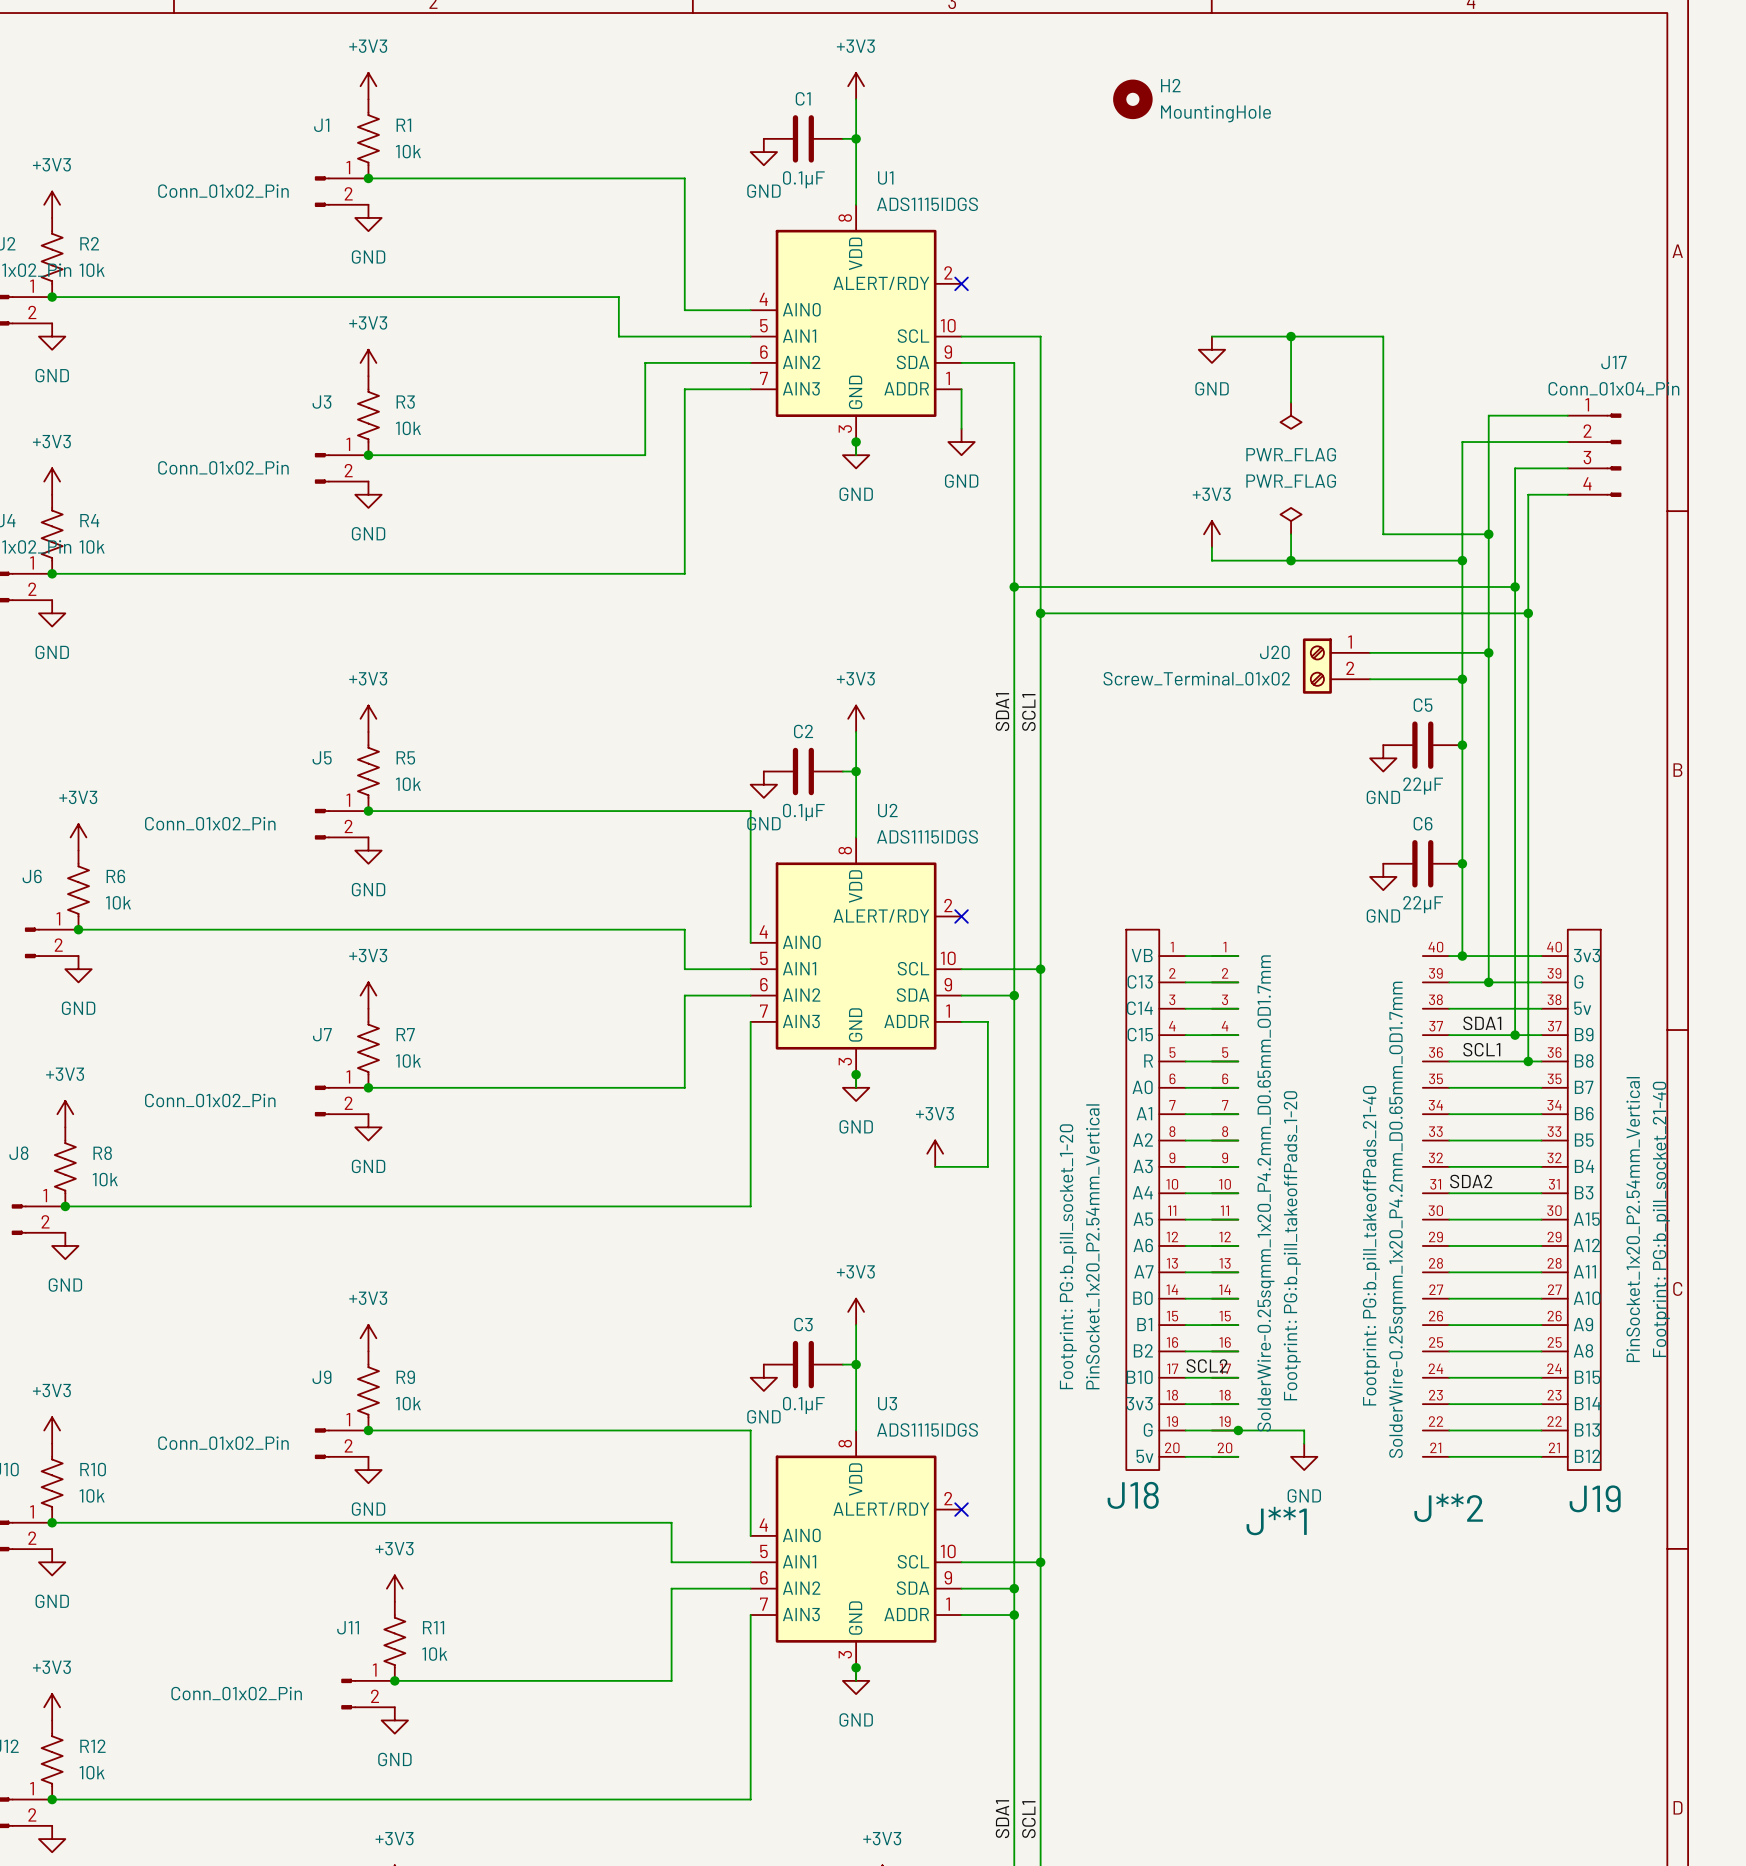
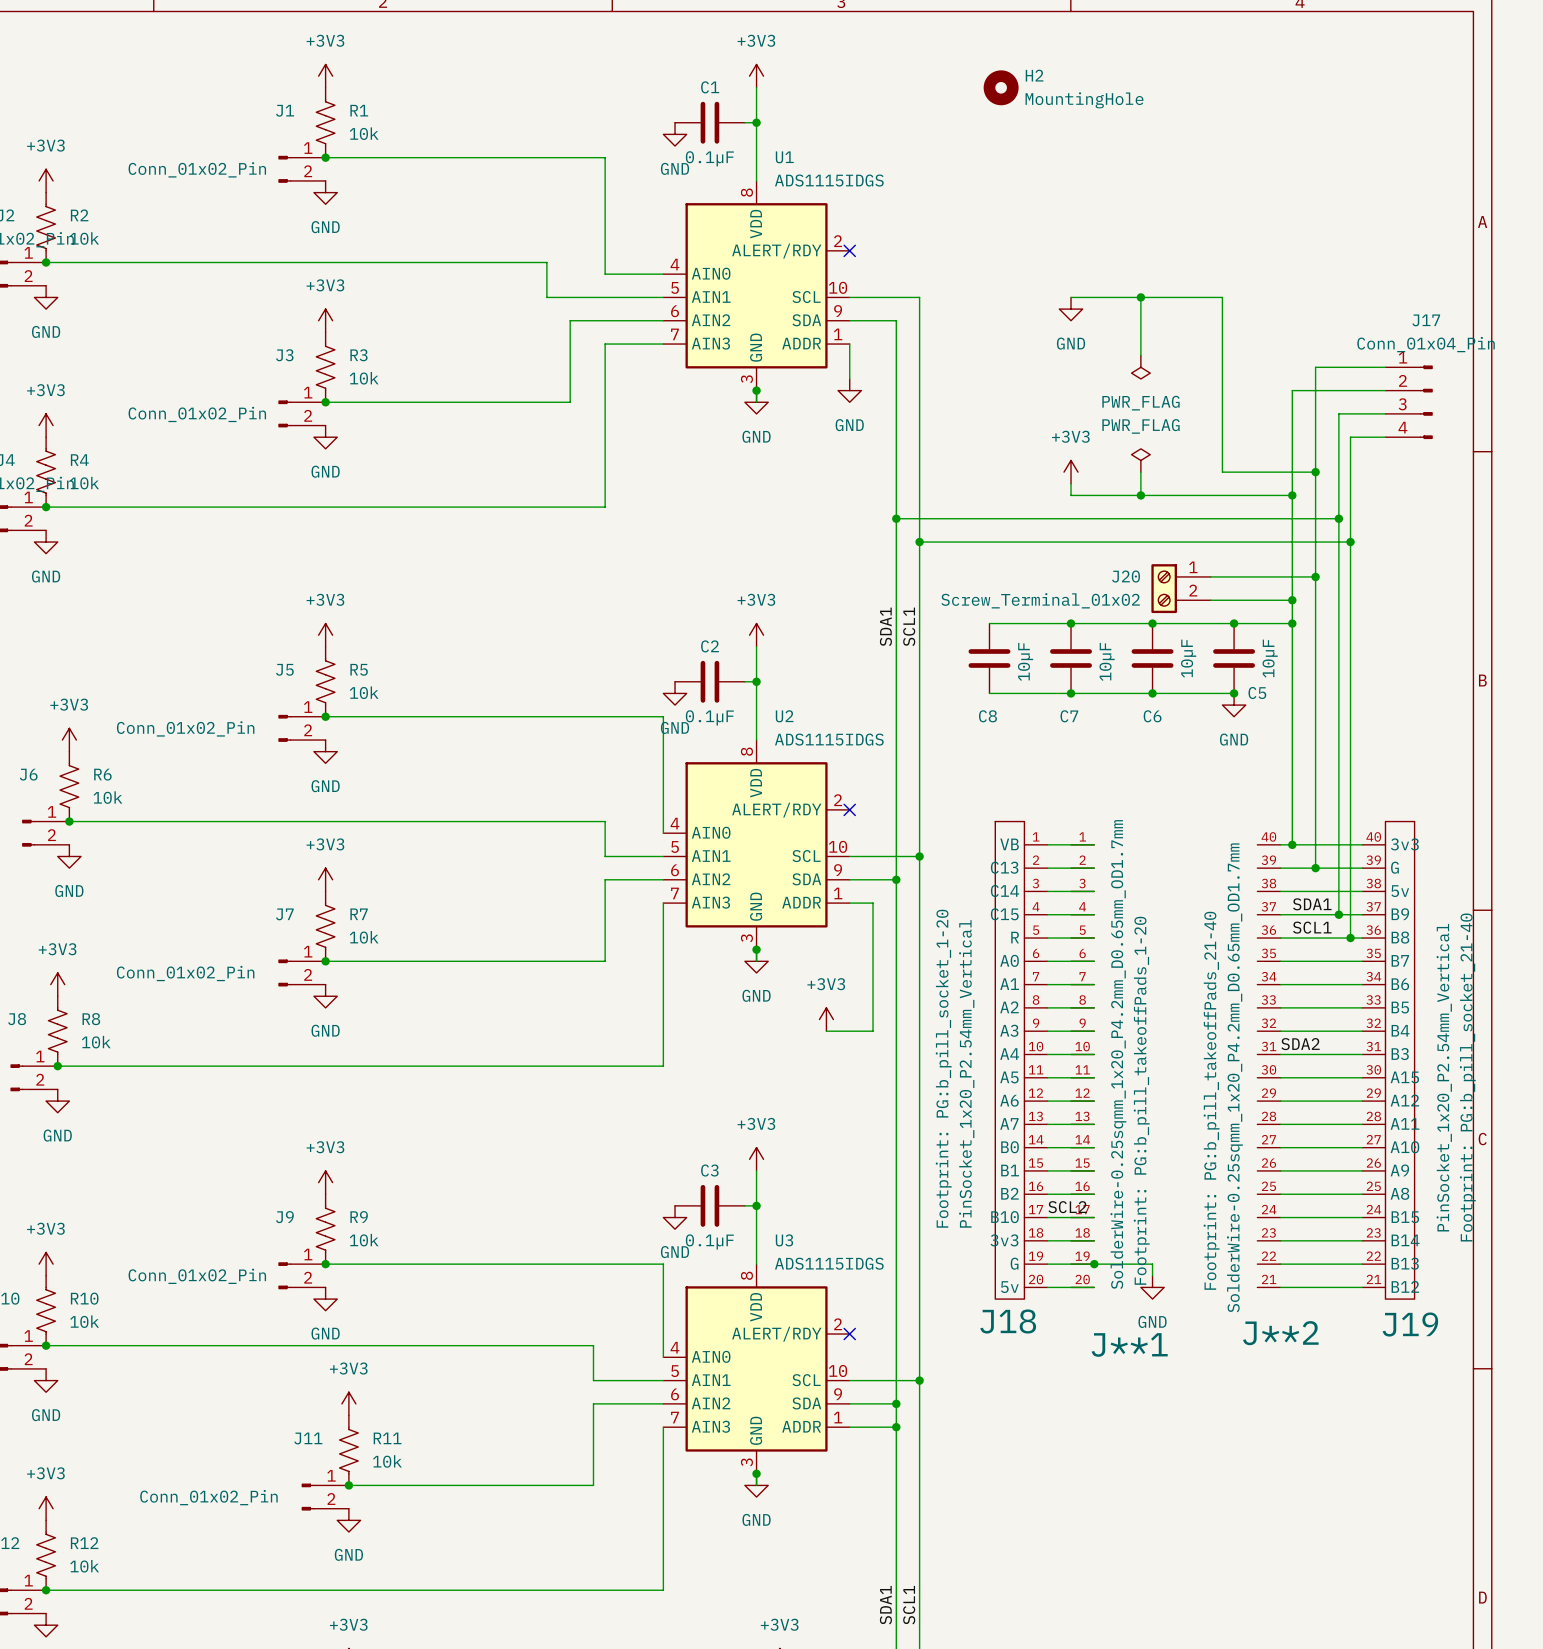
wire: none -> (989, 623) (1292, 623)
junction: none -> (1071, 623)
junction: none -> (1152, 623)
junction: none -> (1234, 623)
C5 name position: C5 (1423, 705) -> C5 (1257, 693)
junction: none -> (1292, 623)
C8: none -> 10µF (989, 658)
C7: none -> 10µF (1071, 658)
C5 rotation: 0° (1422, 745) -> 90° clockwise (1234, 658)
junction: (1462, 745) -> none
power symbol: GND (1383, 758) -> none
wire: none -> (989, 693) (1234, 693)
junction: none -> (1071, 693)
junction: none -> (1152, 693)
junction: none -> (1234, 693)
C5 value: 22µF (1423, 786) -> 10µF (1270, 658)
power symbol: none -> GND (1234, 705)
C6 name position: C6 (1423, 823) -> C6 (1152, 716)
C6 rotation: 0° (1422, 863) -> 90° clockwise (1152, 658)
C6 position: (1422, 863) -> (1152, 658)
junction: (1462, 863) -> none
power symbol: GND (1383, 876) -> none
C6 value: 22µF (1423, 904) -> 10µF (1188, 658)

